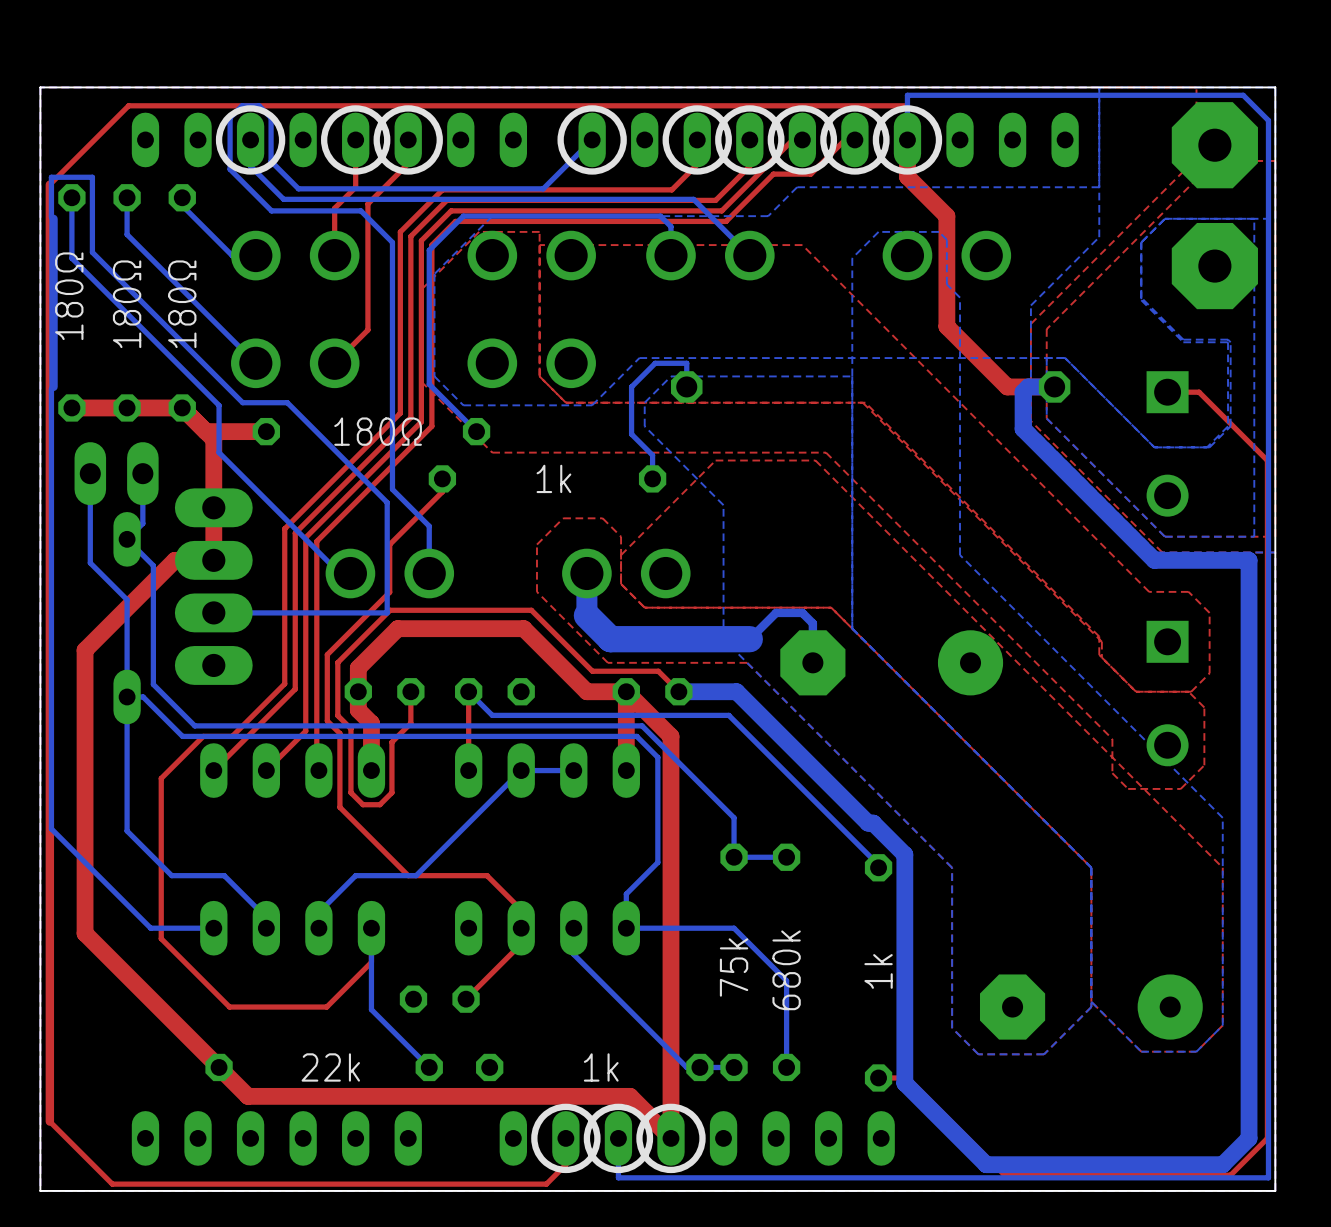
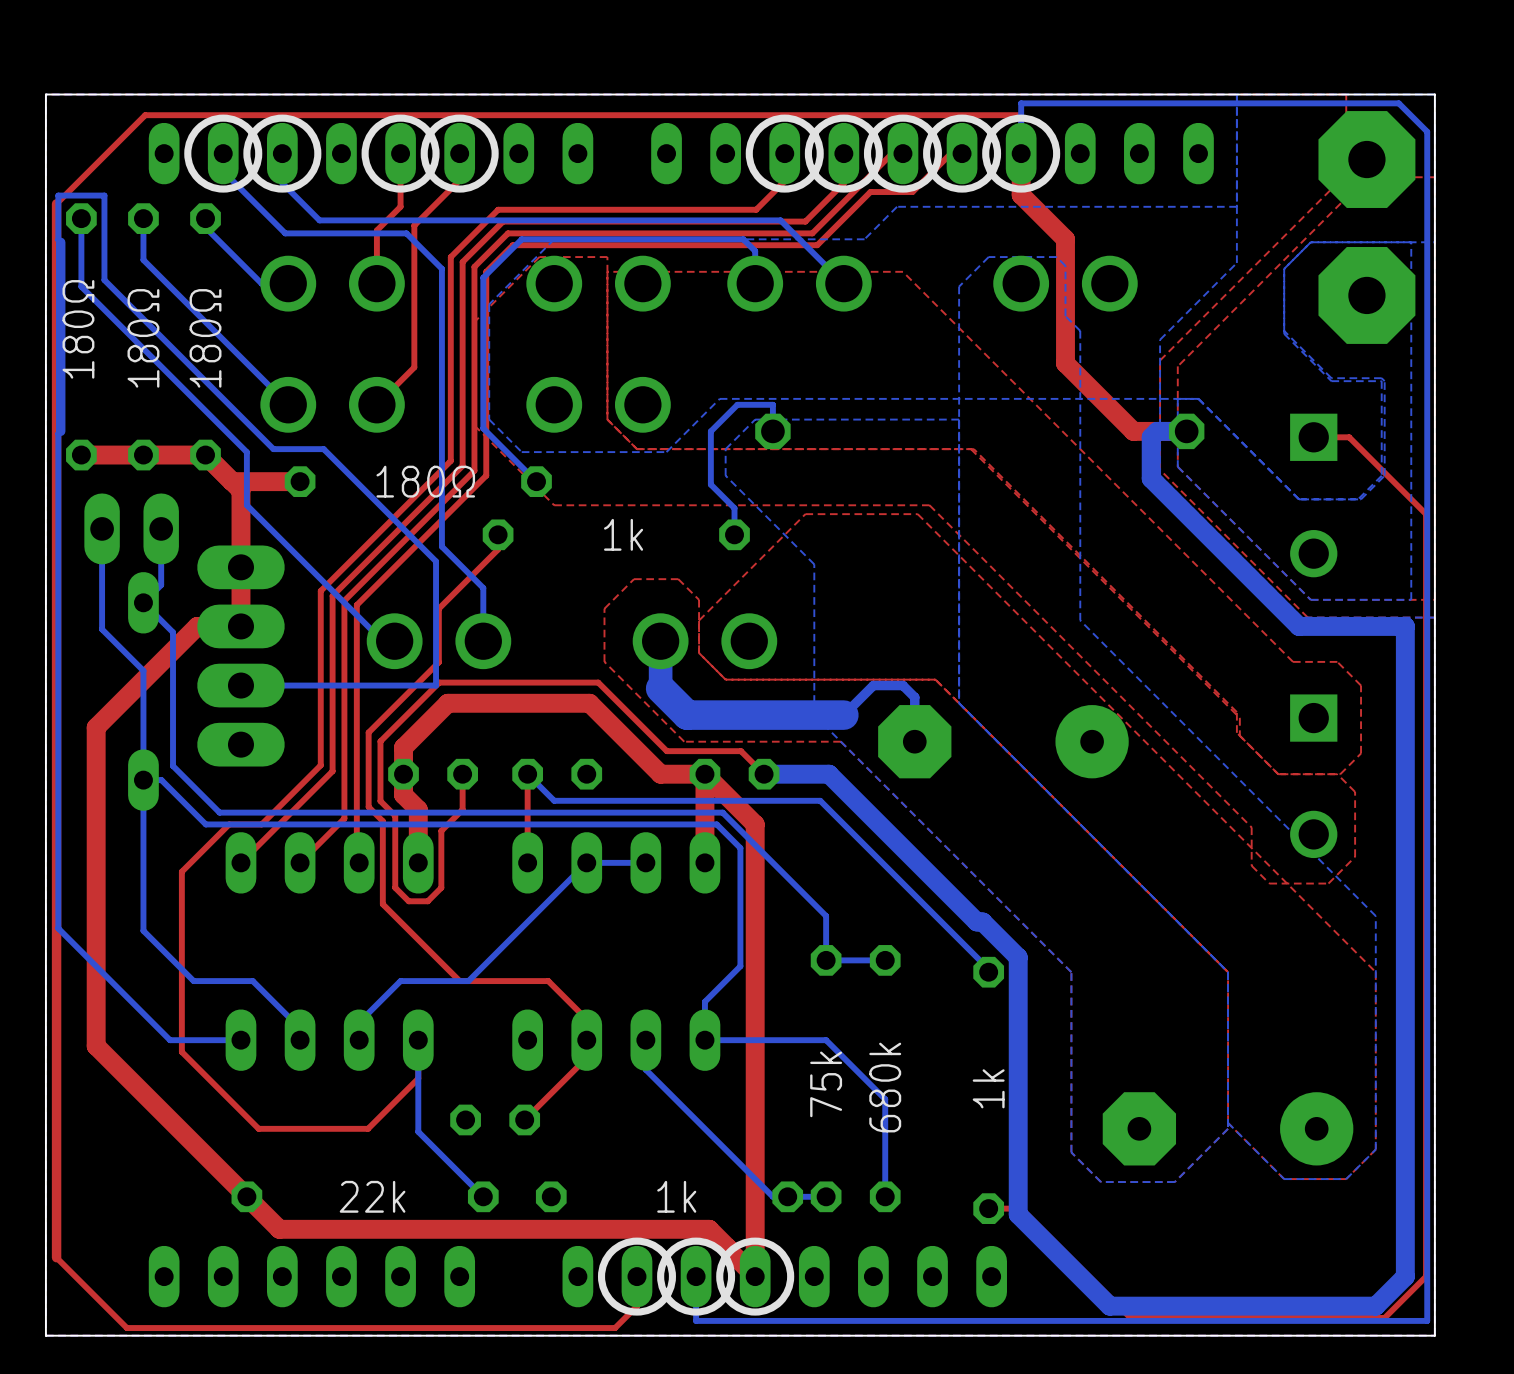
bottom track: (592, 139) (543, 188) (298, 188) (271, 161) (271, 117) (259, 105) (242, 105) (230, 117) (230, 169) (271, 210) -> (223, 153) (223, 171) (285, 233) (306, 233)
drawing position: (592, 139) -> (223, 153)

